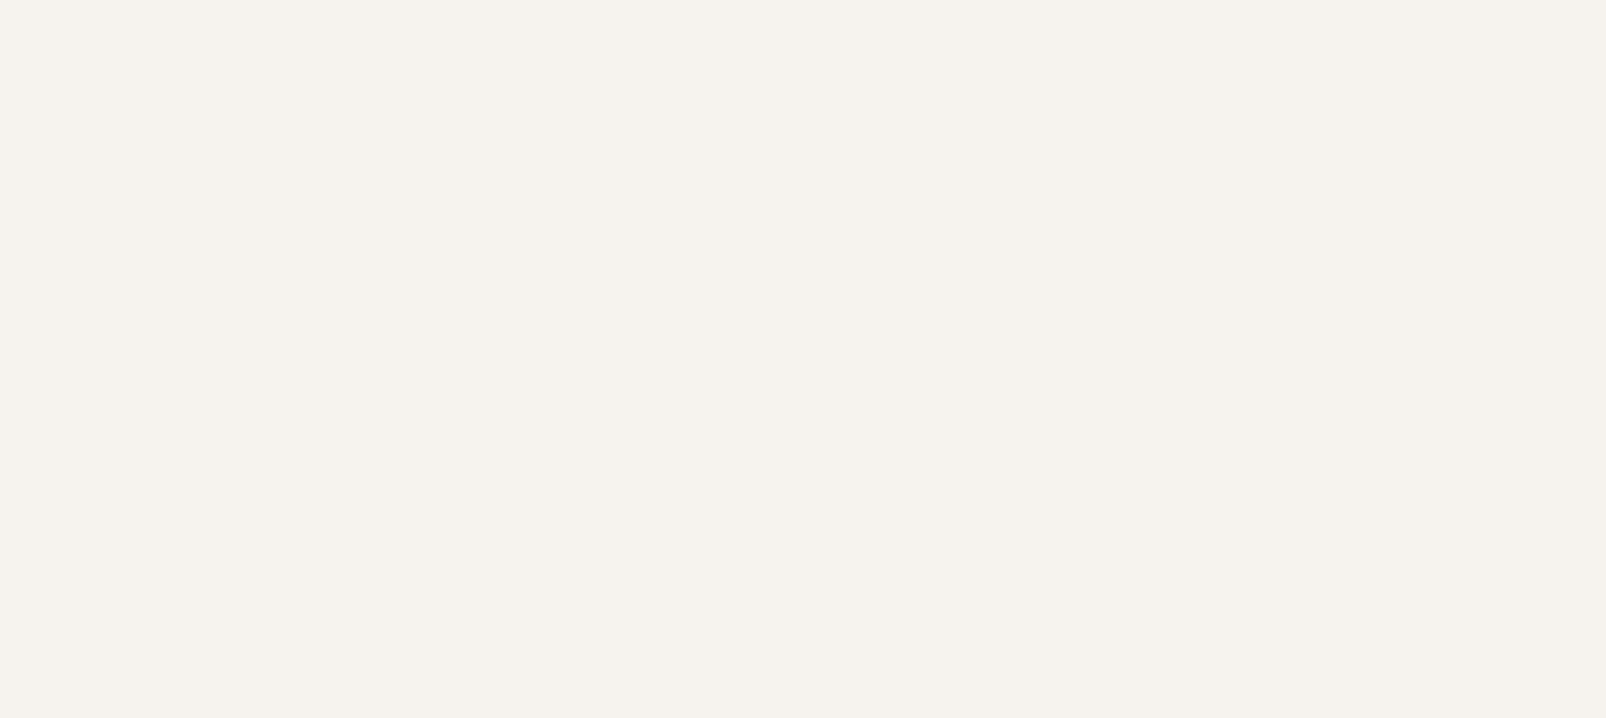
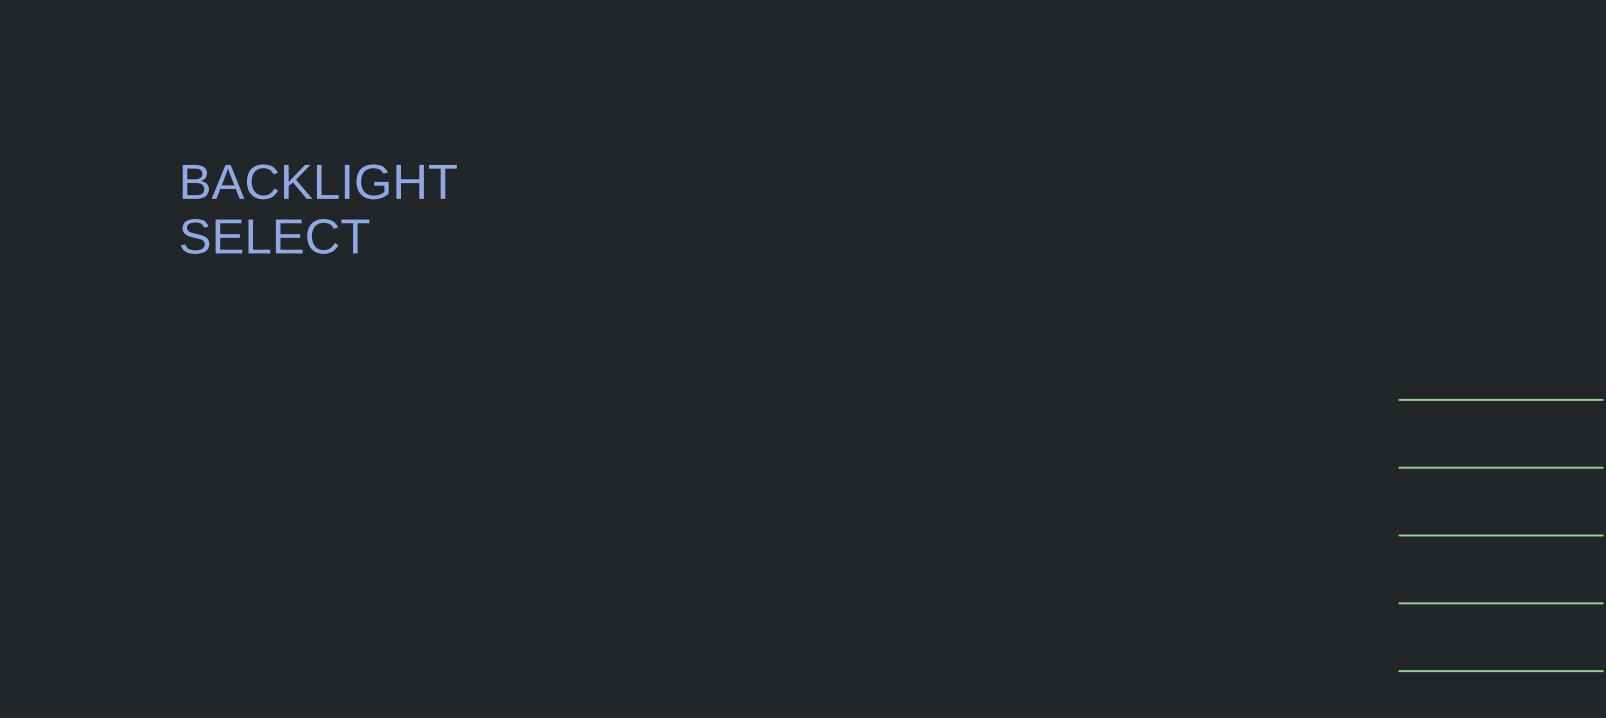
text: none -> BACKLIGHT (319, 181)
text: none -> SELECT (275, 236)
wire: none -> (1399, 399) (1602, 399)
wire: none -> (1399, 467) (1602, 467)
wire: none -> (1399, 535) (1602, 535)
wire: none -> (1399, 603) (1602, 603)
wire: none -> (1399, 671) (1602, 671)

